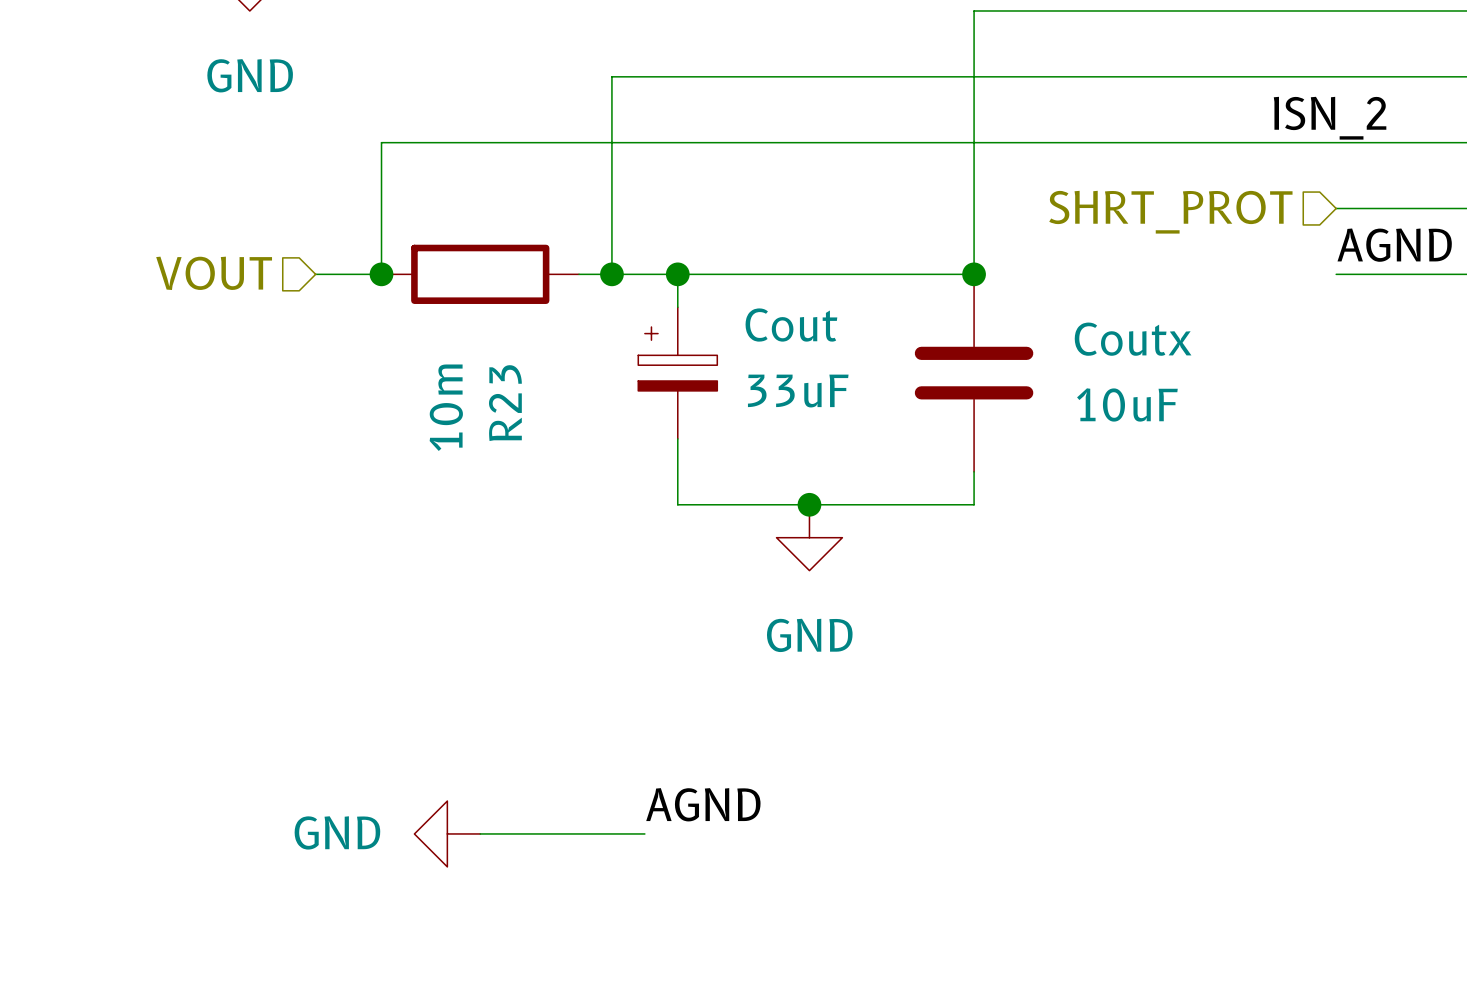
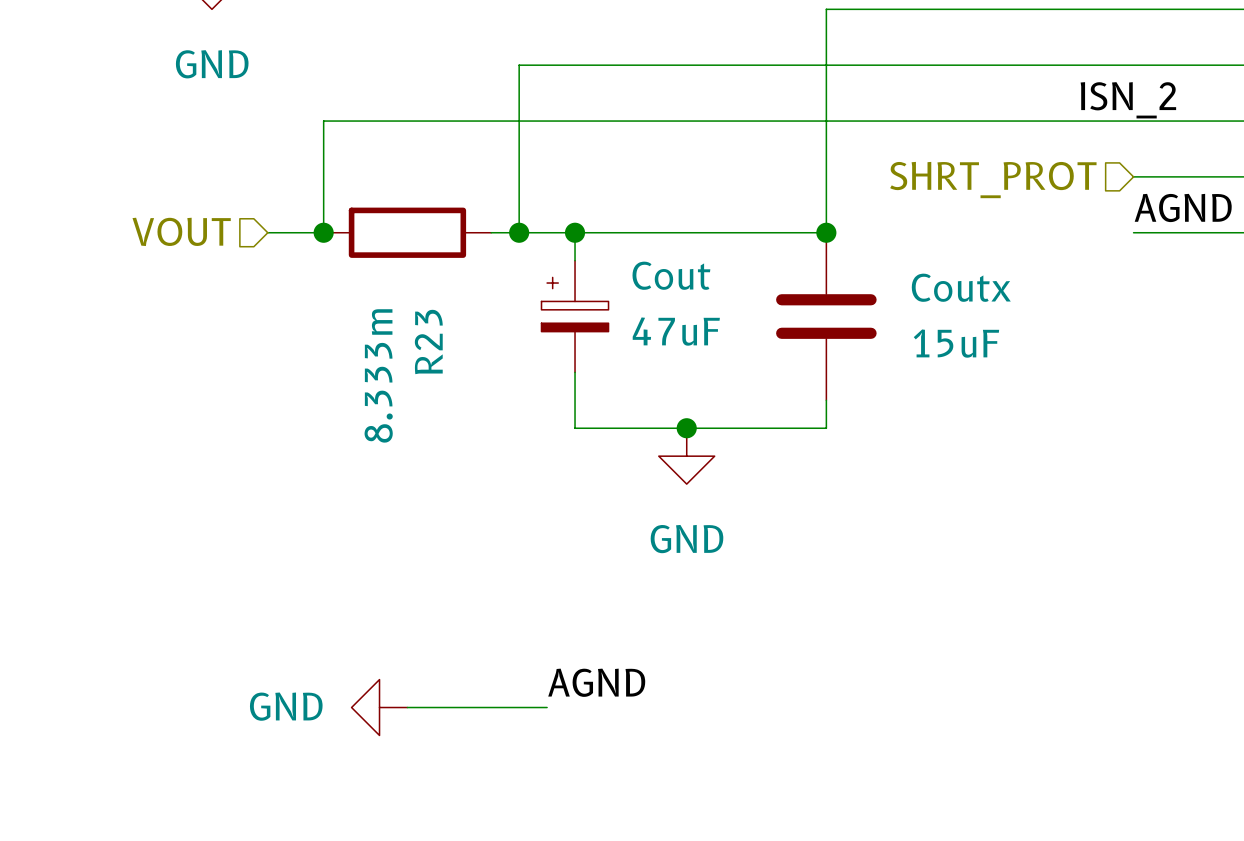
Cout value: 33uF (798, 391) -> 47uF (676, 331)
Coutx value: 10uF (1127, 404) -> 15uF (956, 343)
R23 value: 10m (446, 407) -> 8.333m (378, 375)

